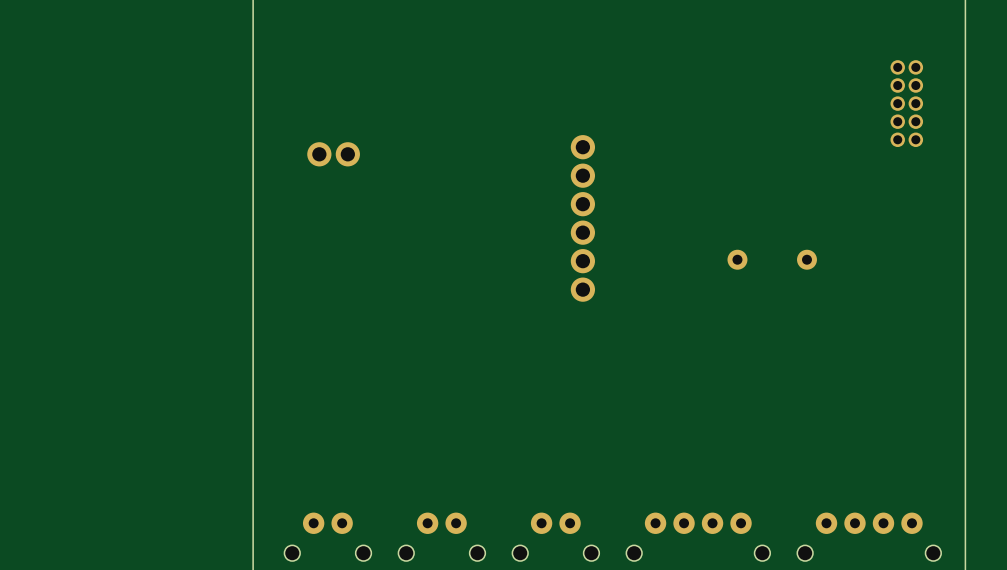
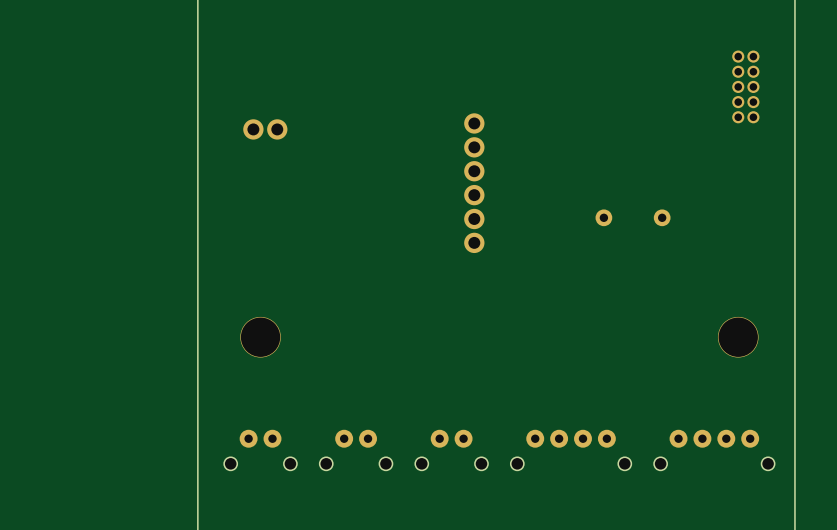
part: none -> (260, 337)
part: none -> (738, 337)

